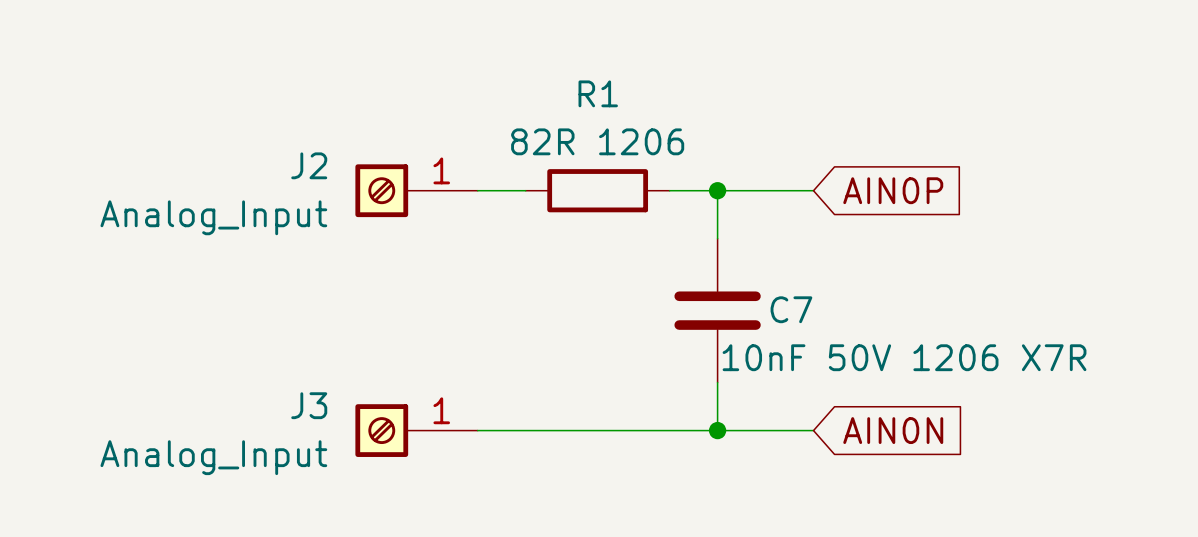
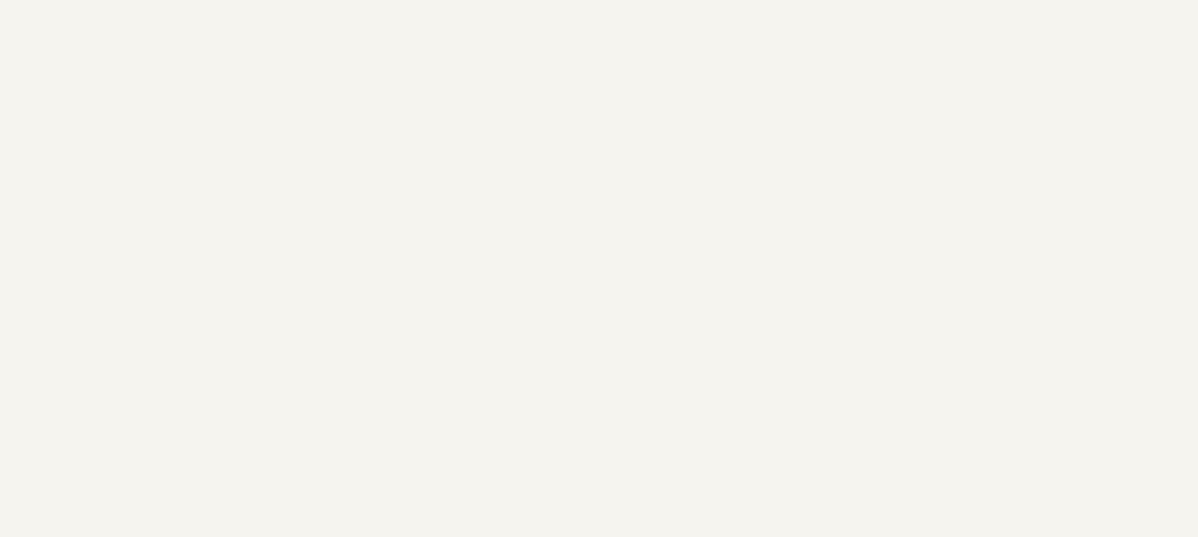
J2: Analog_Input (416, 190) -> none
wire: (477, 190) (525, 190) -> none
R1: 82R 1206 (597, 190) -> none
wire: (669, 190) (813, 190) -> none
wire: (717, 190) (717, 238) -> none
junction: (717, 190) -> none
global label: AIN0P (893, 190) -> none
C7: 10nF 50V 1206 X7R (717, 310) -> none
wire: (717, 382) (717, 430) -> none
J3: Analog_Input (416, 430) -> none
wire: (477, 430) (813, 430) -> none
junction: (717, 430) -> none
global label: AIN0N (893, 430) -> none

